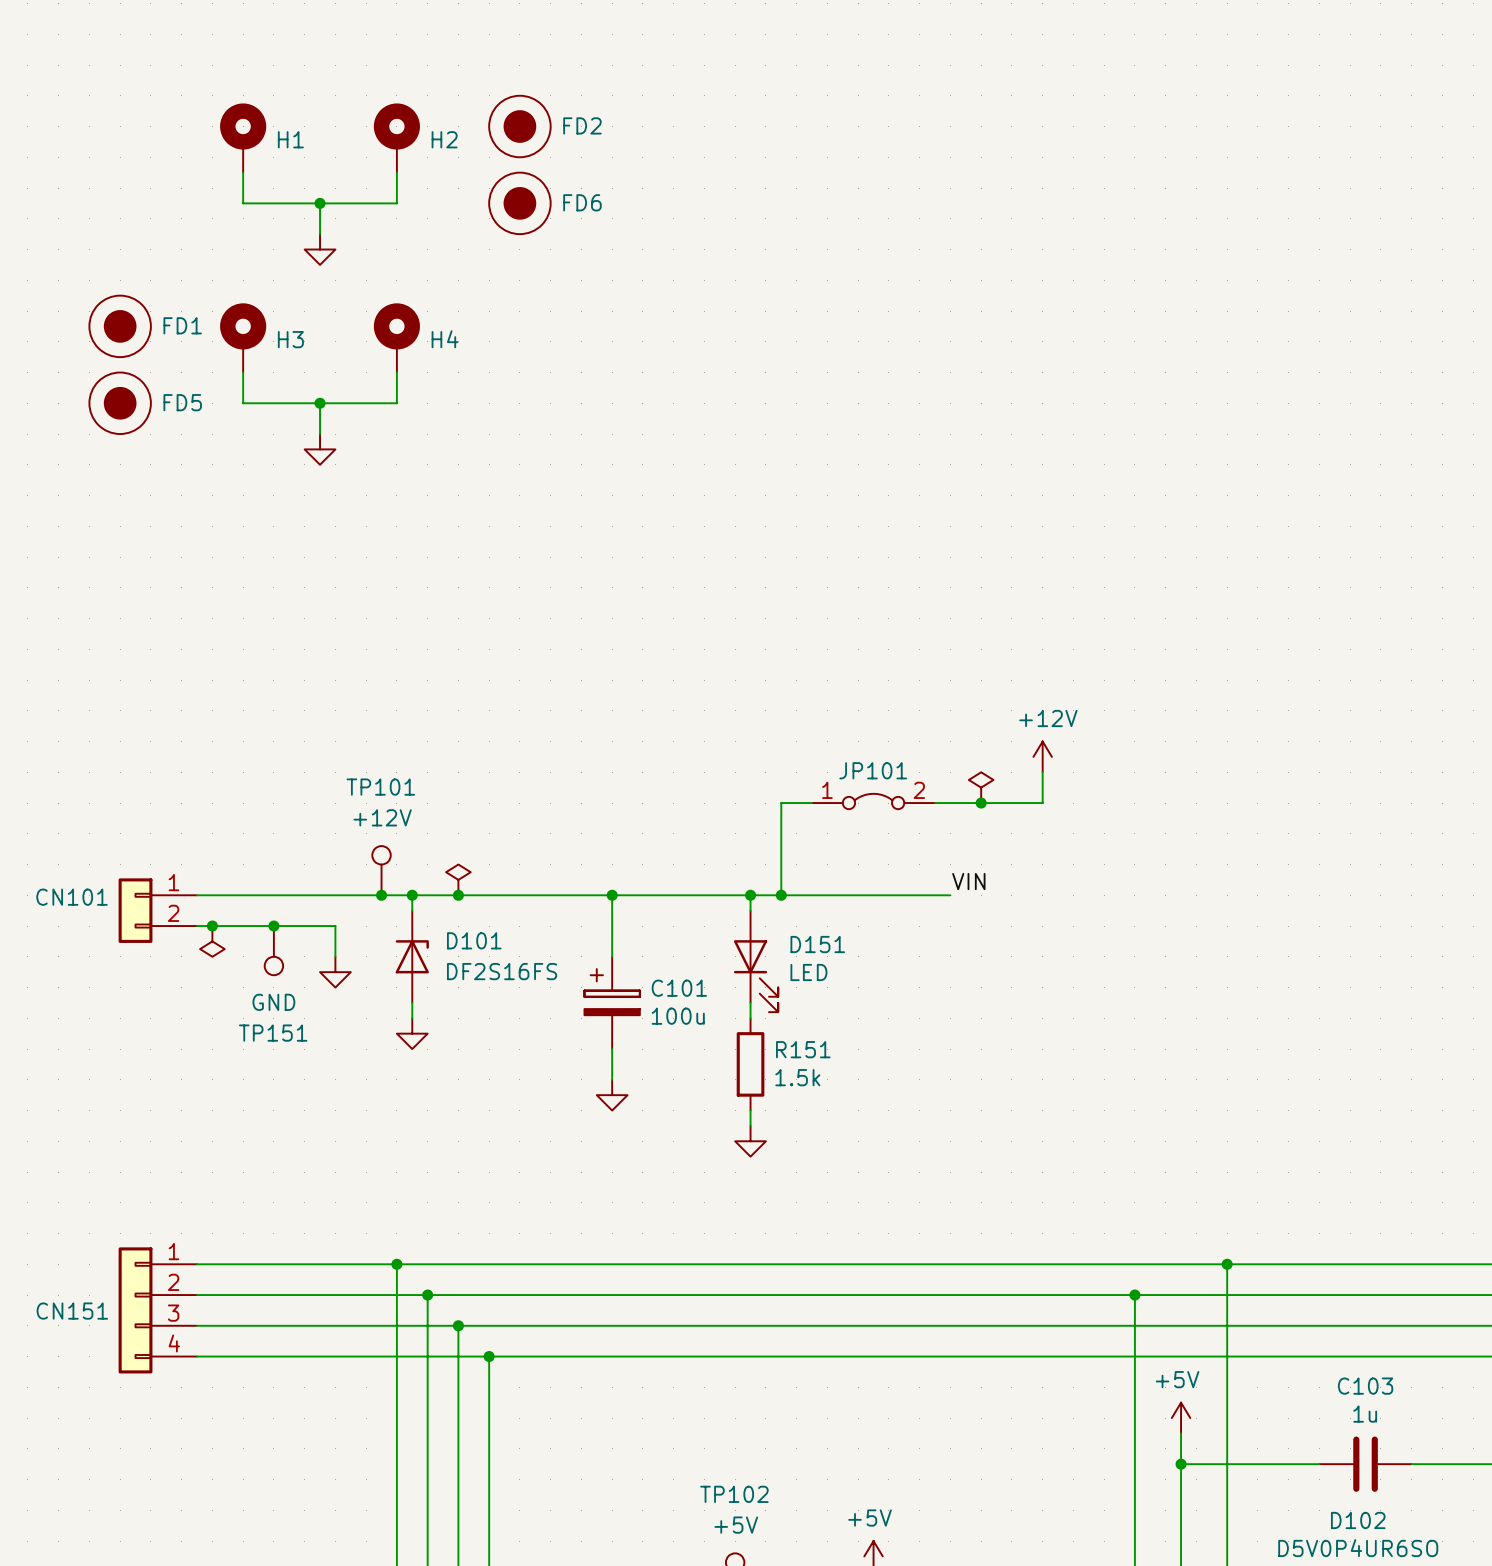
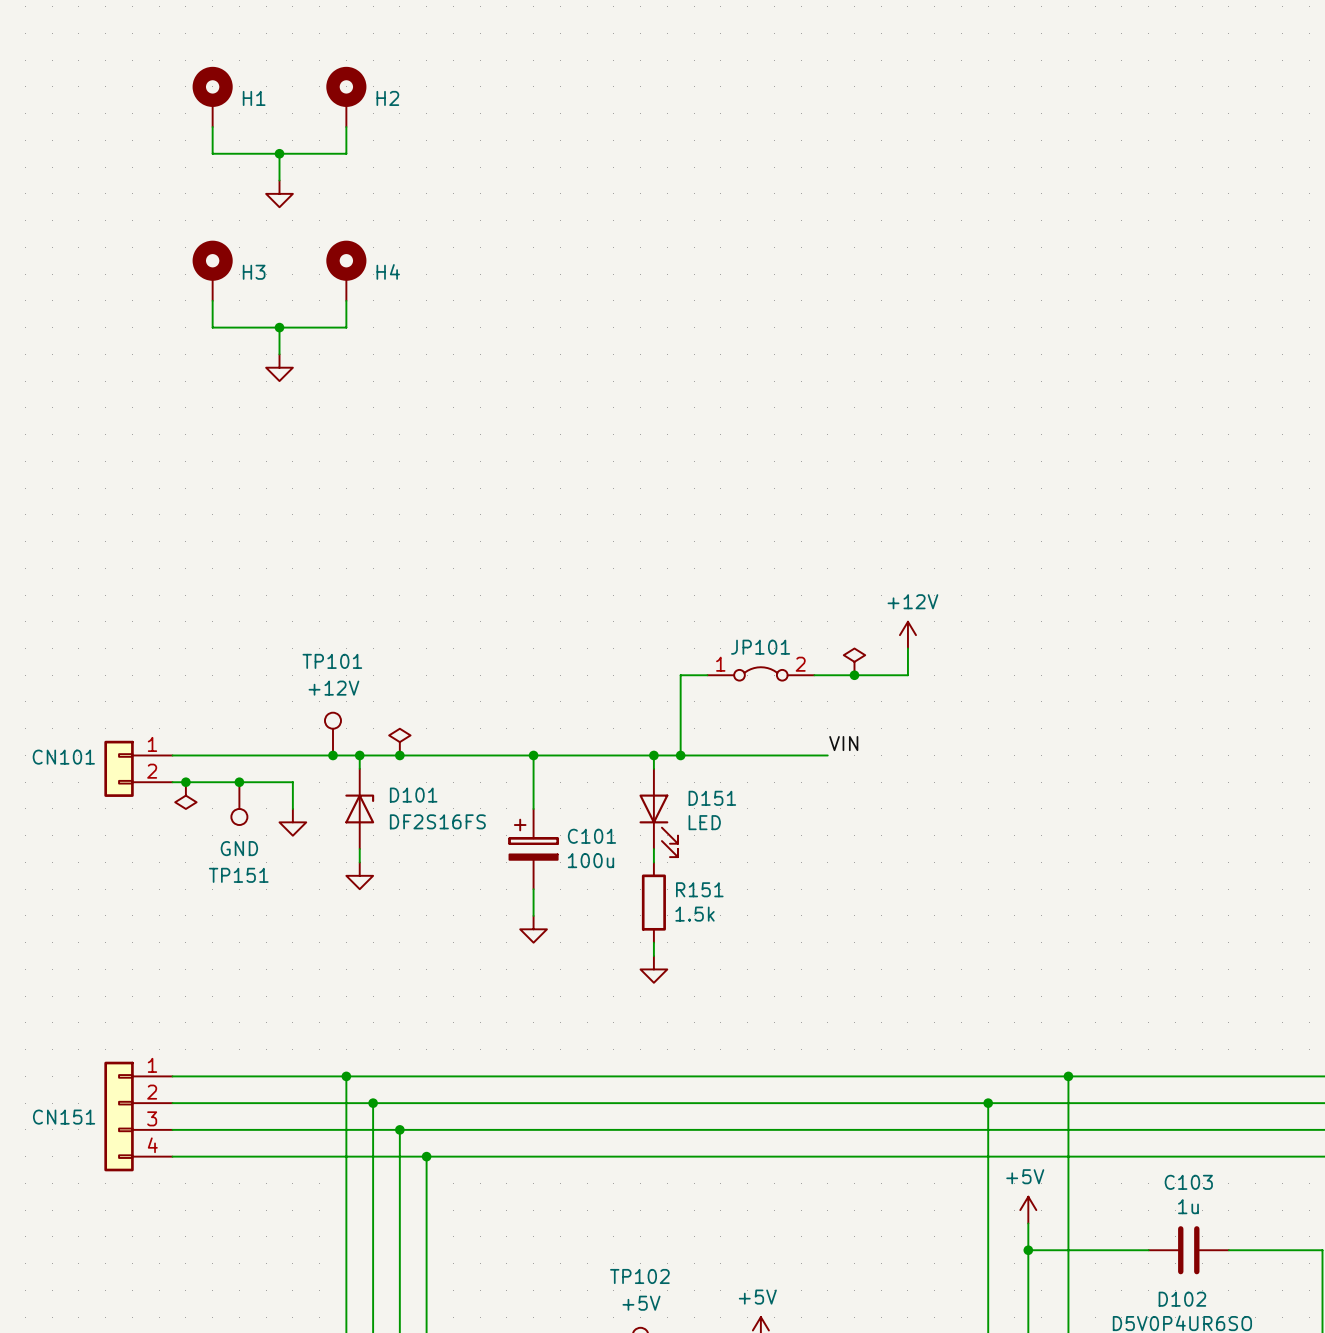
FD2: (519, 126) -> none
FD6: (519, 203) -> none
FD1: (120, 326) -> none
FD5: (120, 403) -> none

